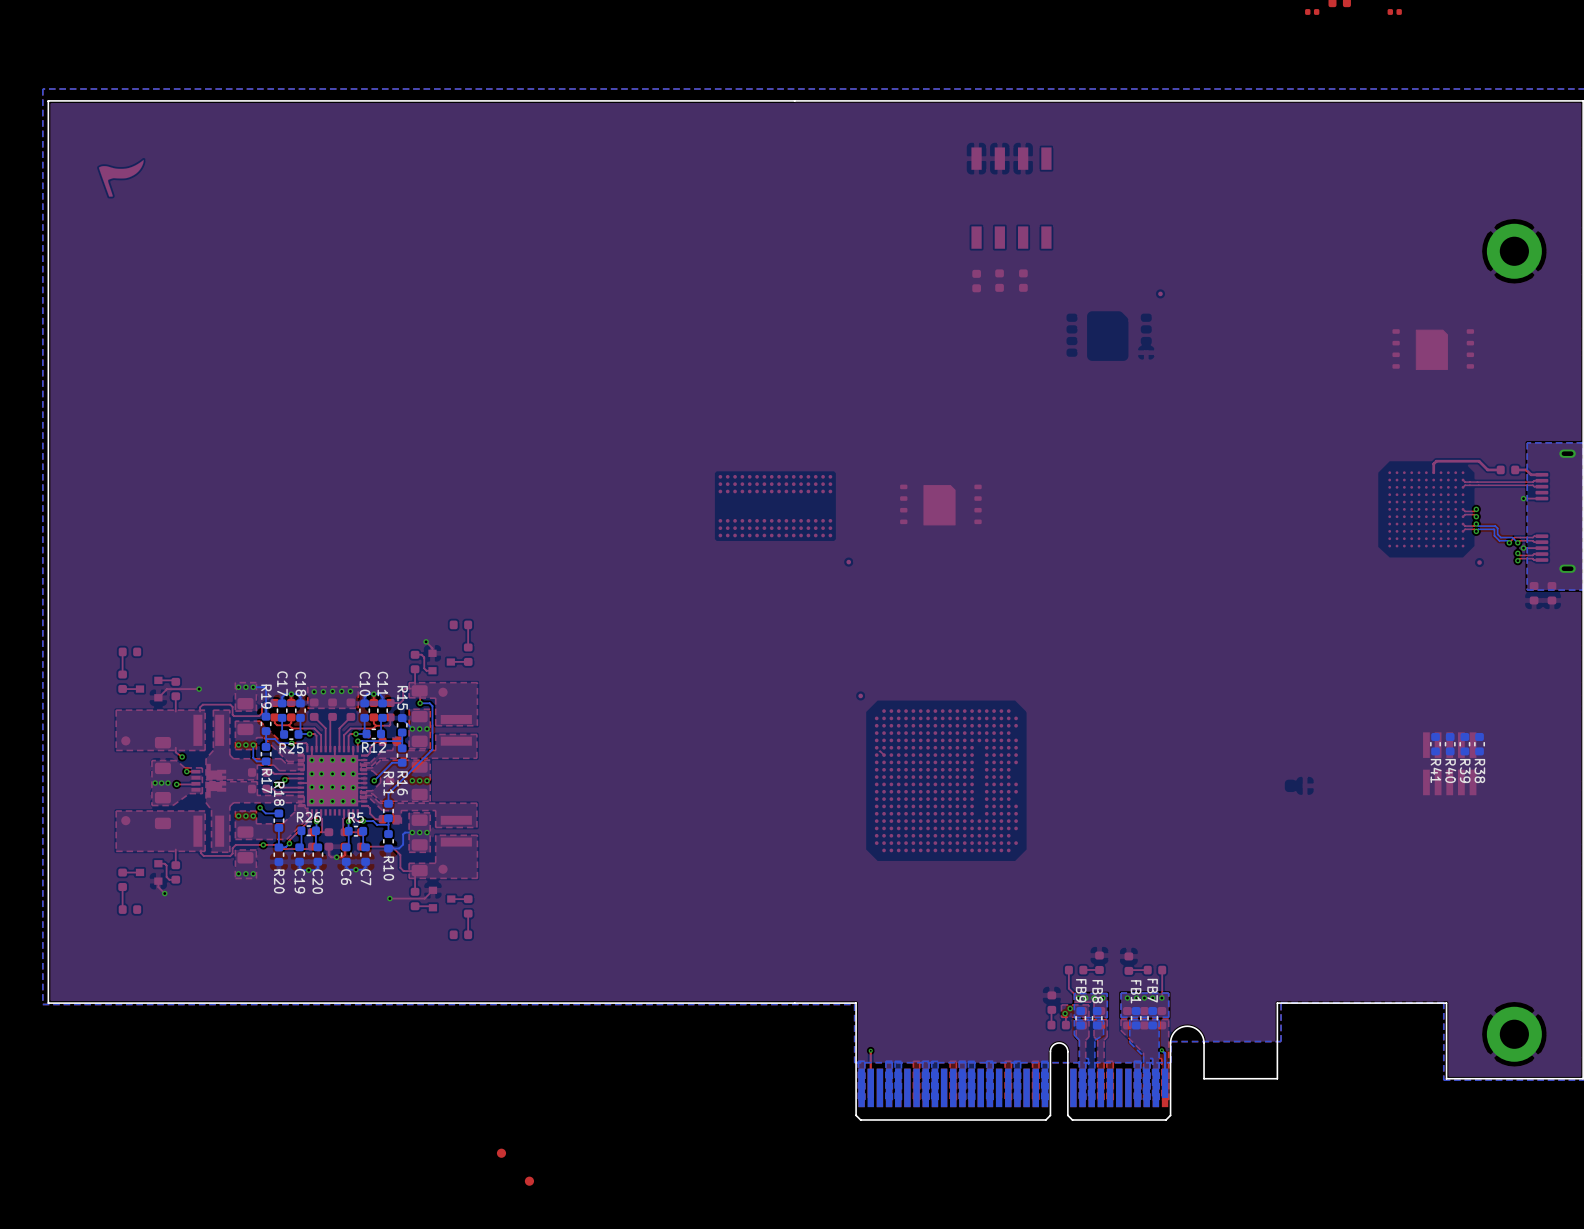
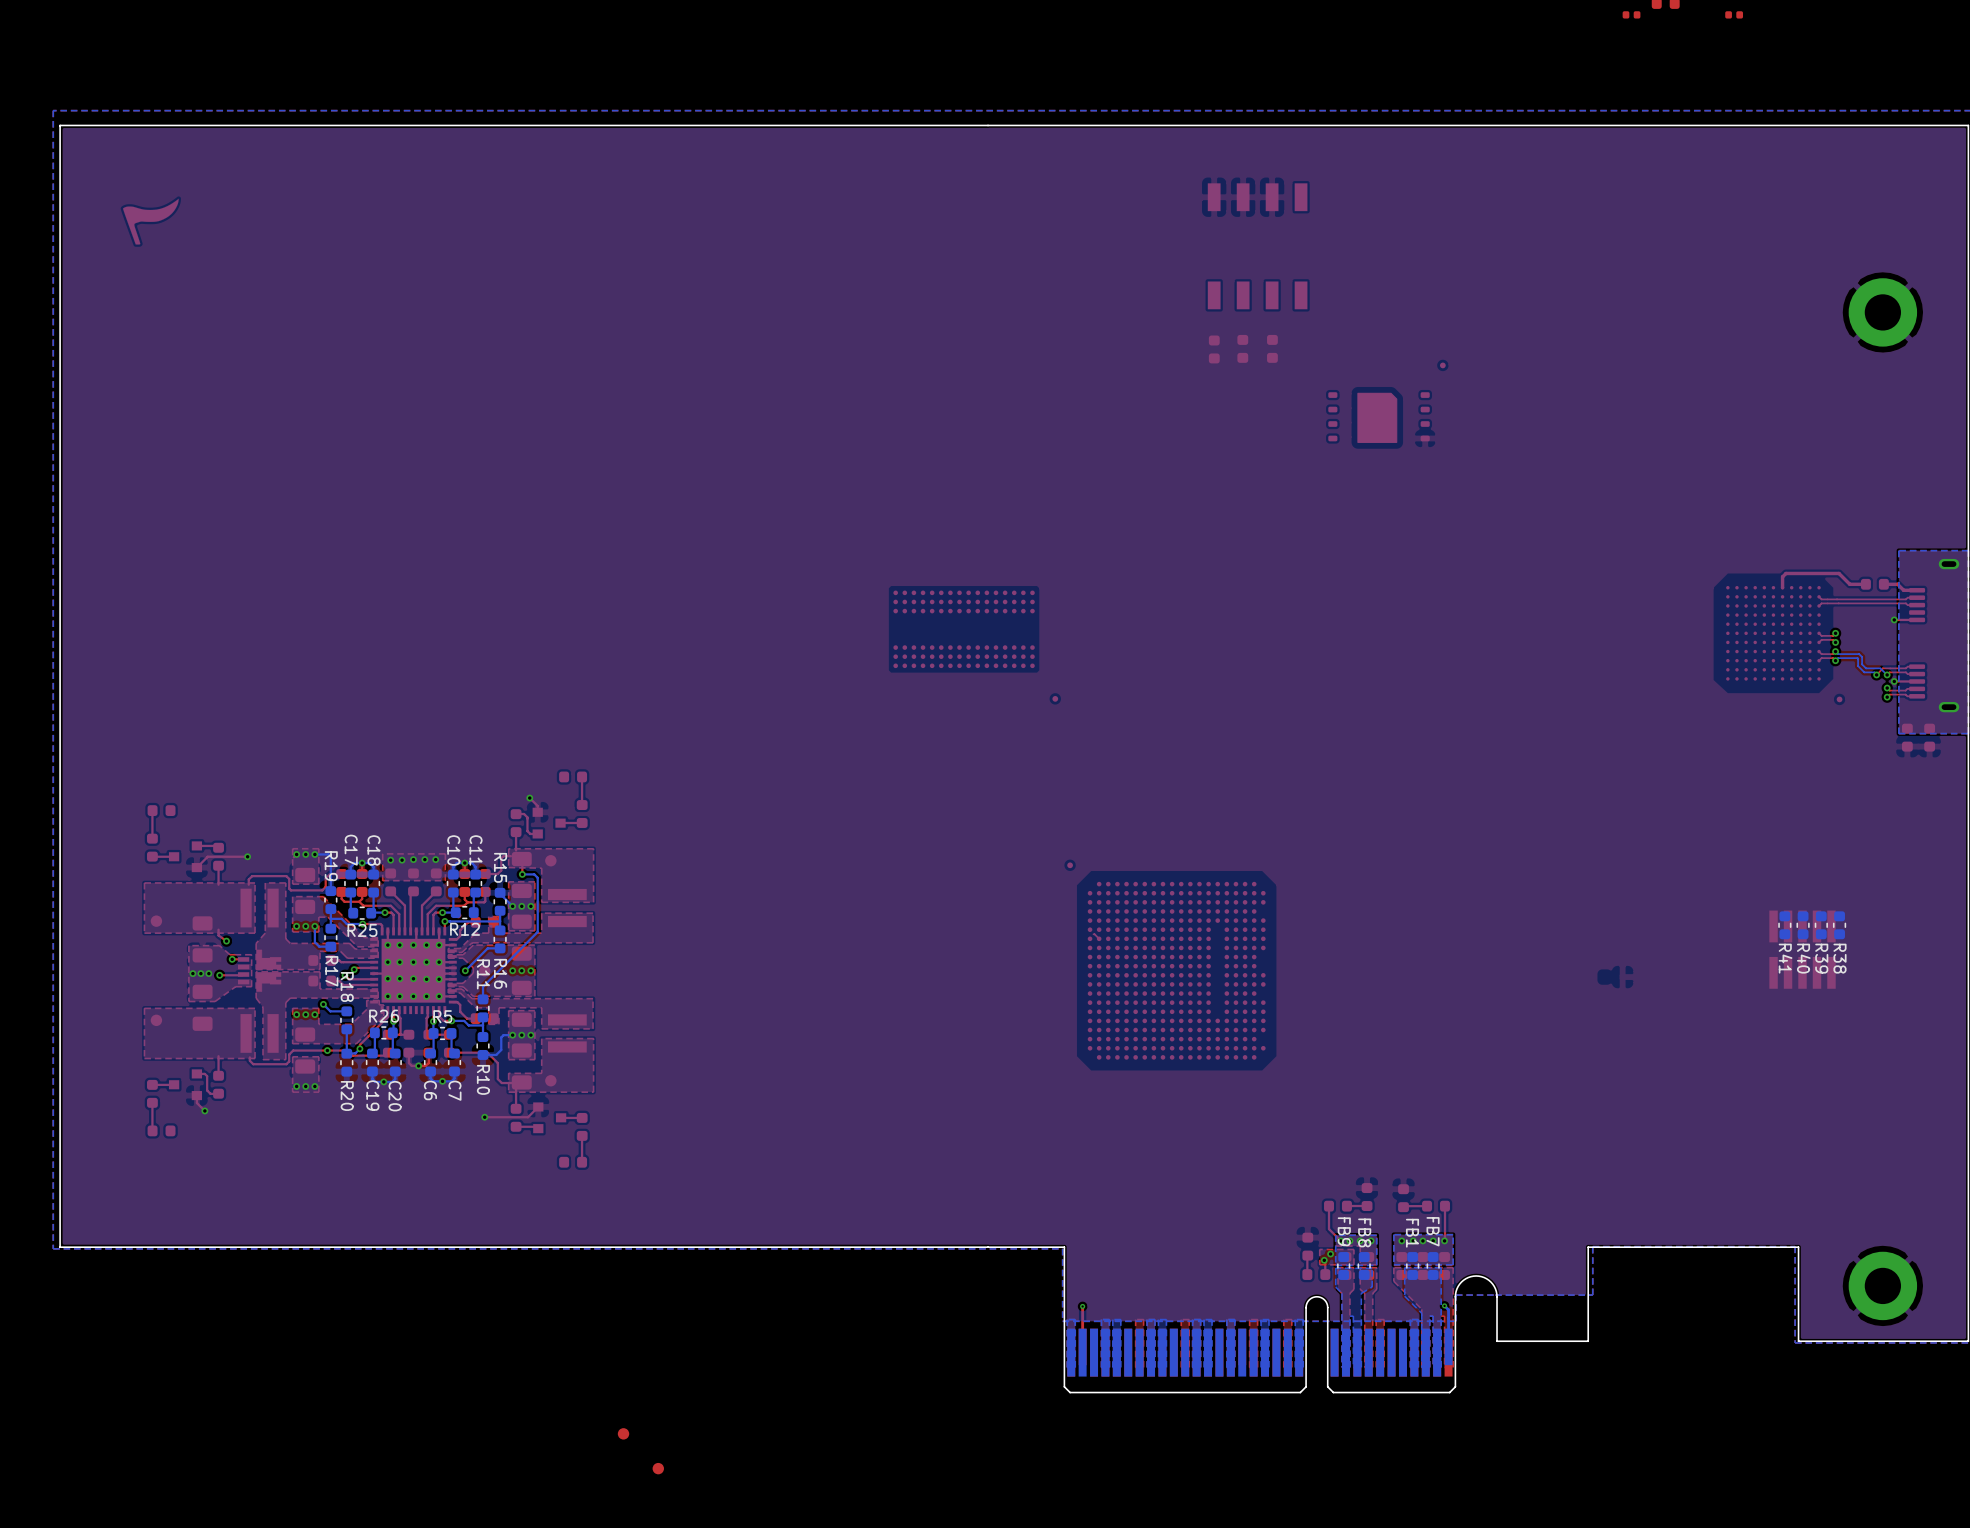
part: none -> (1379, 417)
part: (1433, 349) -> none
part: (940, 505) -> none

